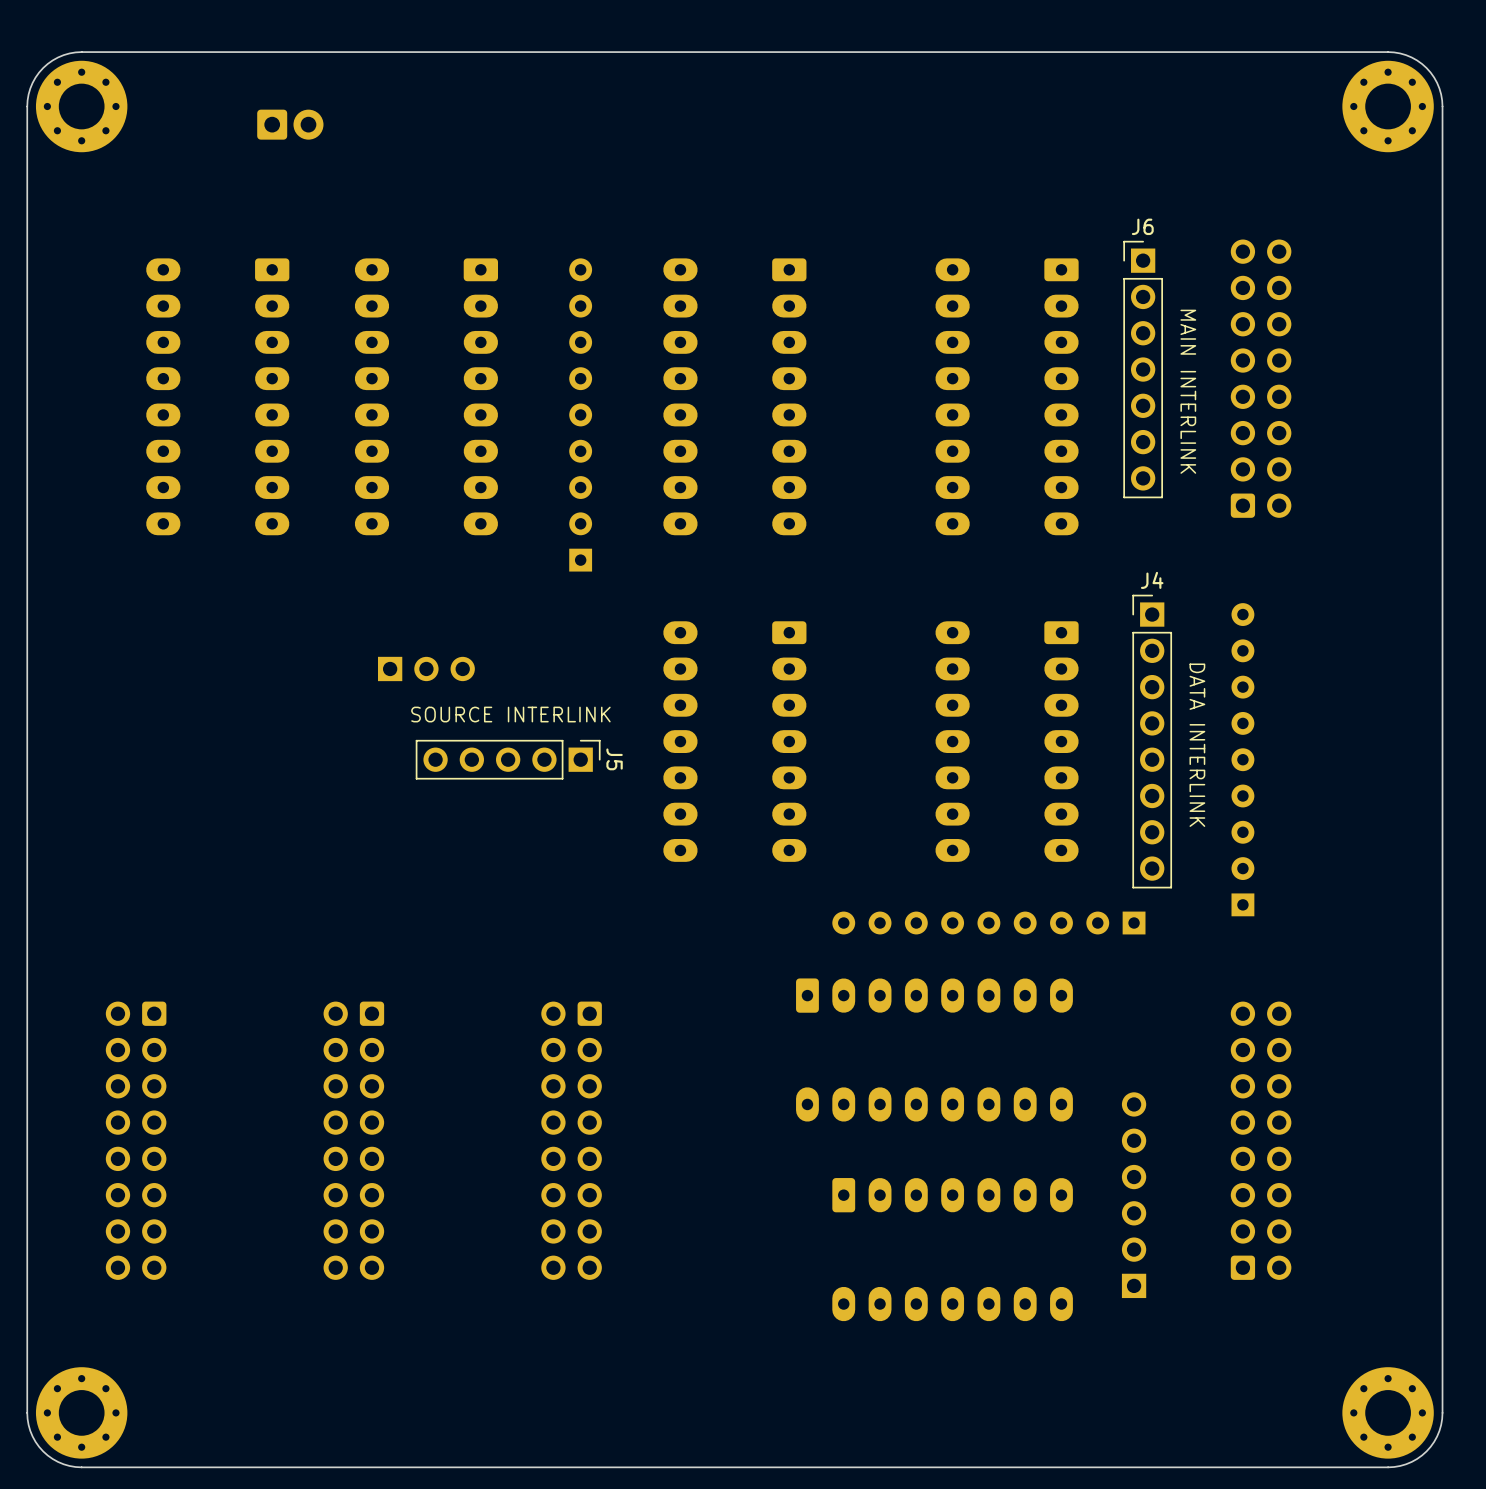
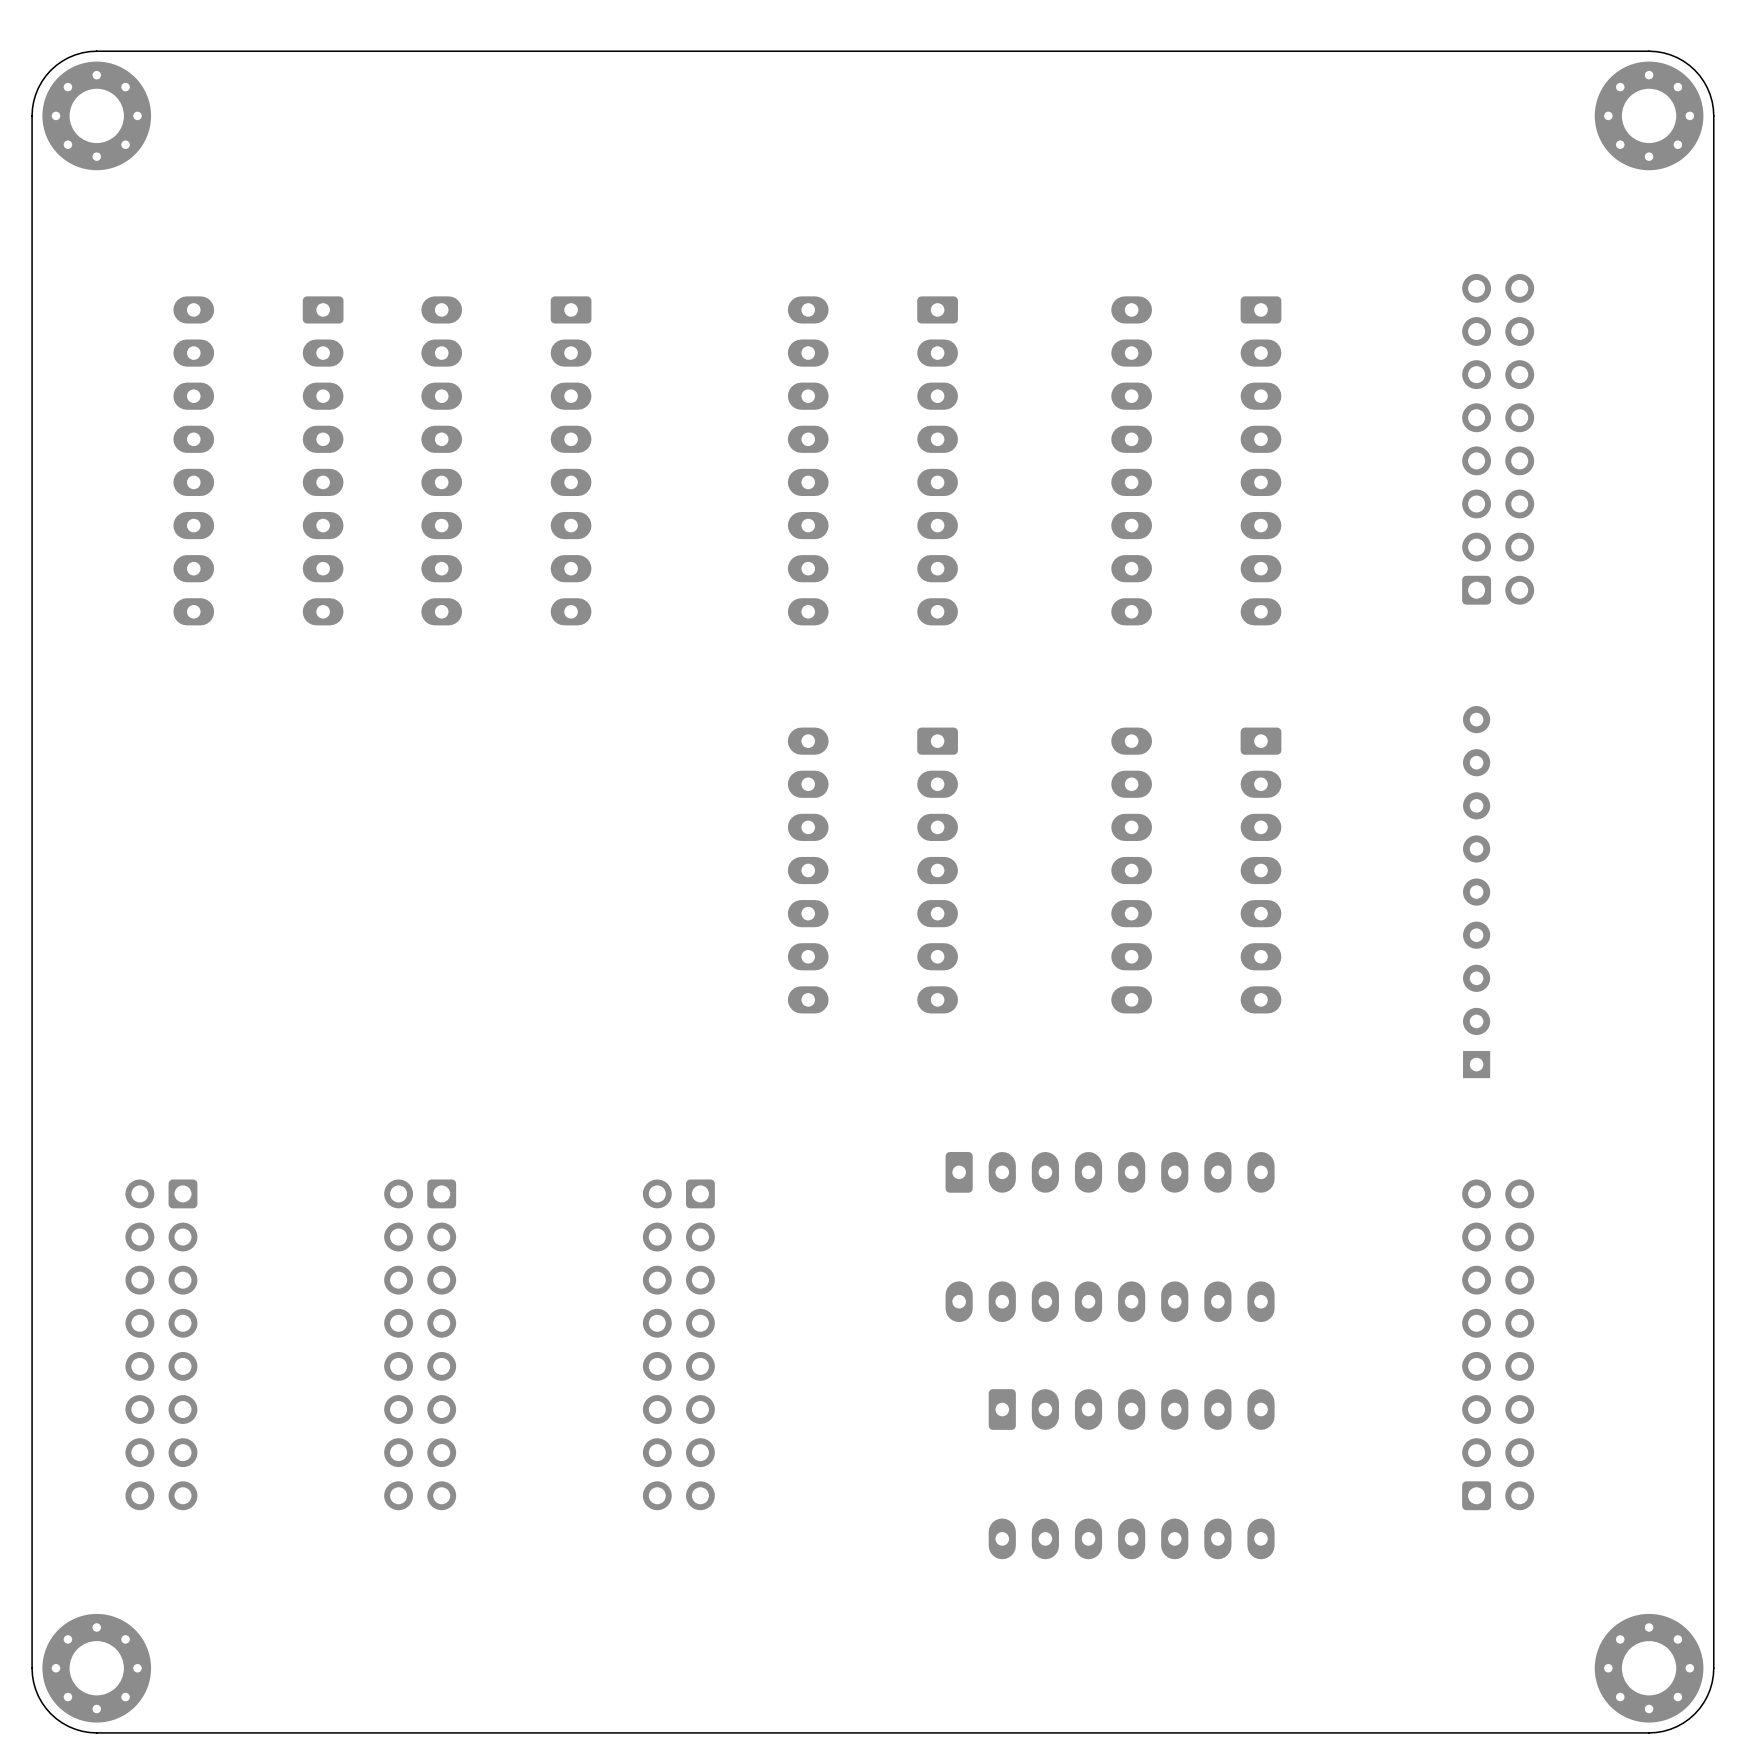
part: (290, 124) -> none
J6: (1143, 369) -> none
text: MAIN INTERLINK (1188, 391) -> none
part: (580, 414) -> none
part: (426, 668) -> none
text: SOURCE INTERLINK (510, 714) -> none
J4: (1152, 741) -> none
text: DATA INTERLINK (1197, 745) -> none
J5: (508, 759) -> none
part: (988, 923) -> none
part: (1134, 1195) -> none

